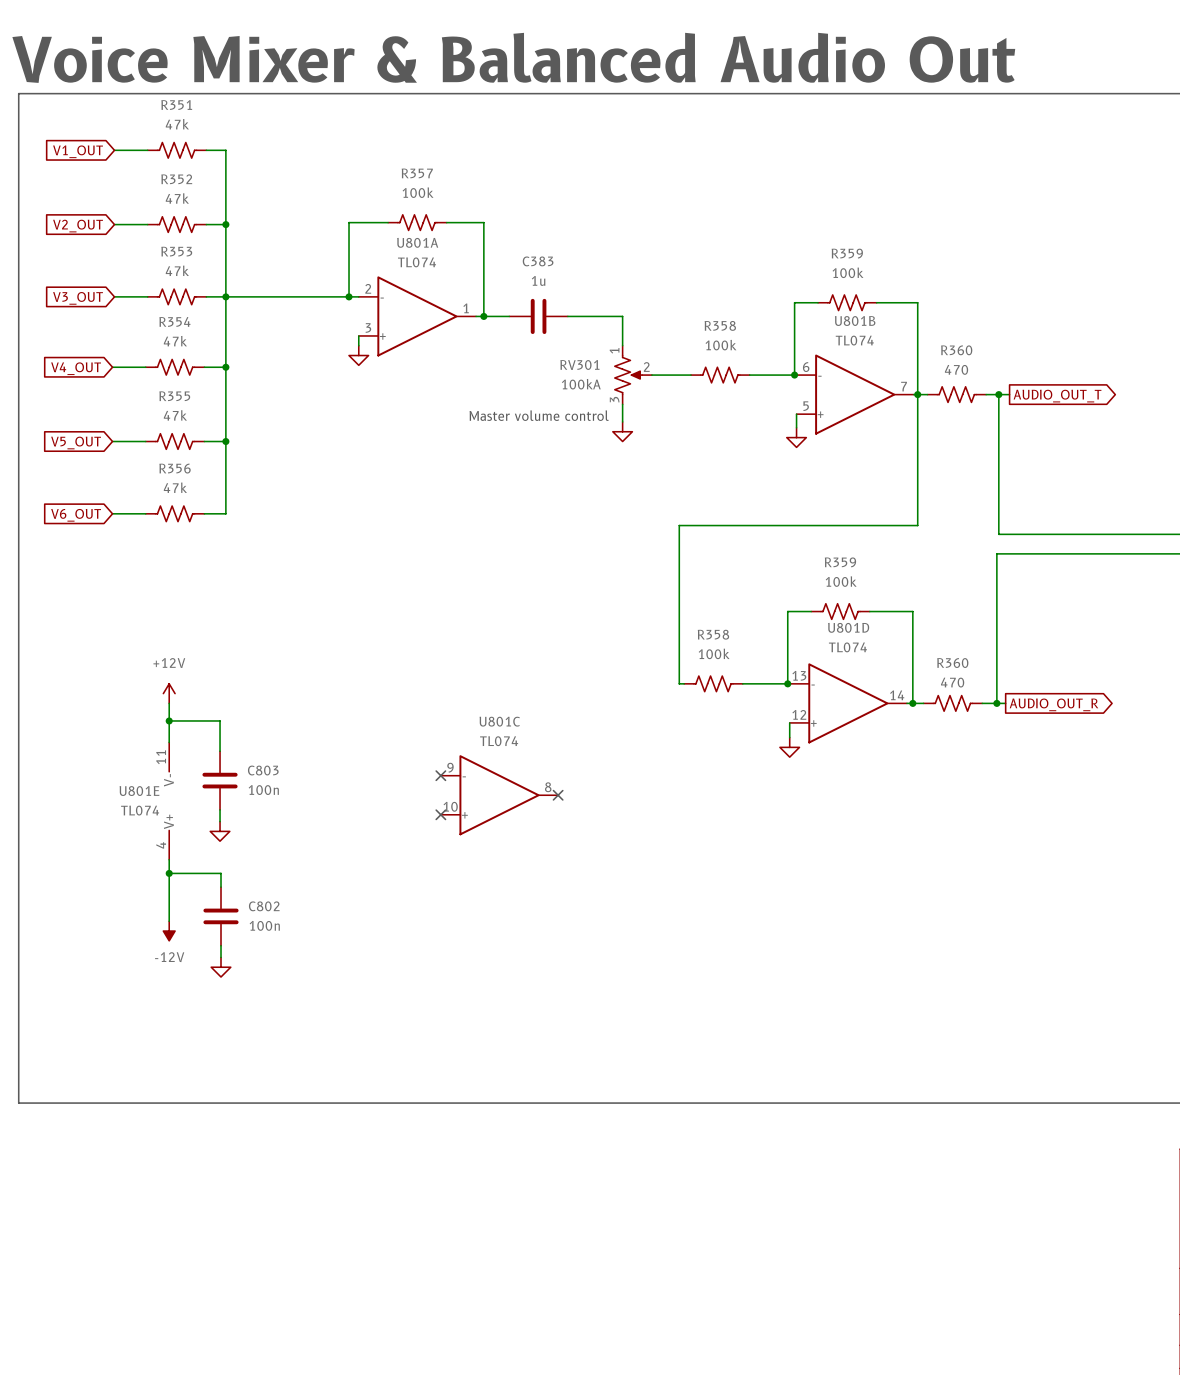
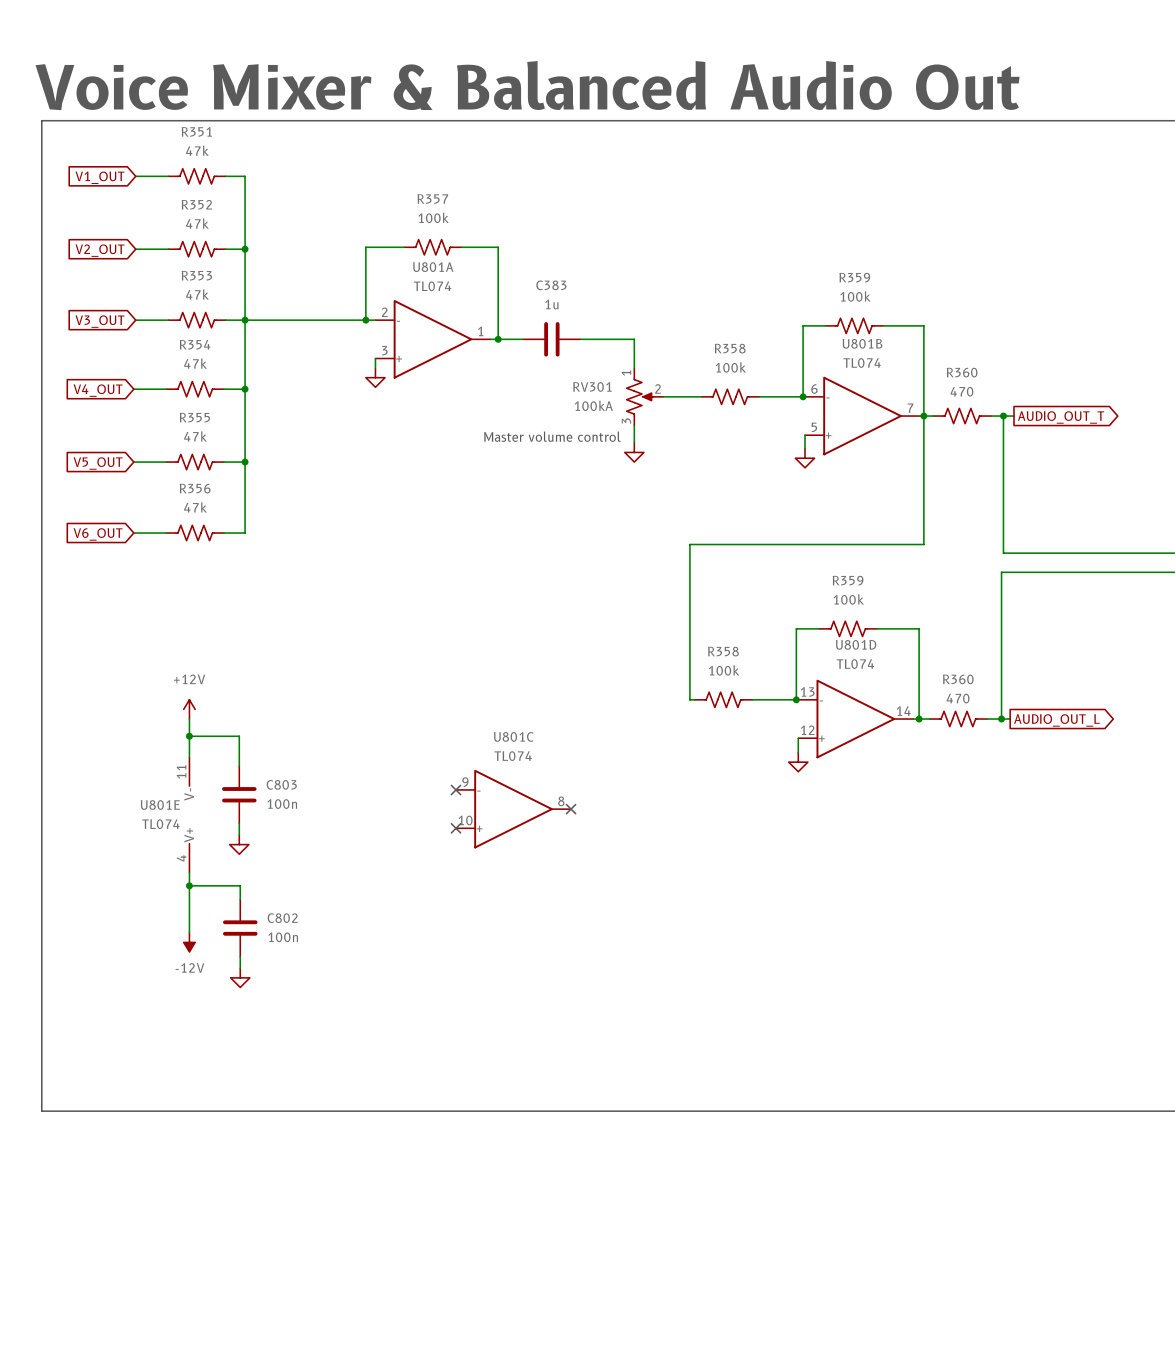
global label: AUDIO_OUT_R (1053, 704) -> AUDIO_OUT_L (1056, 720)

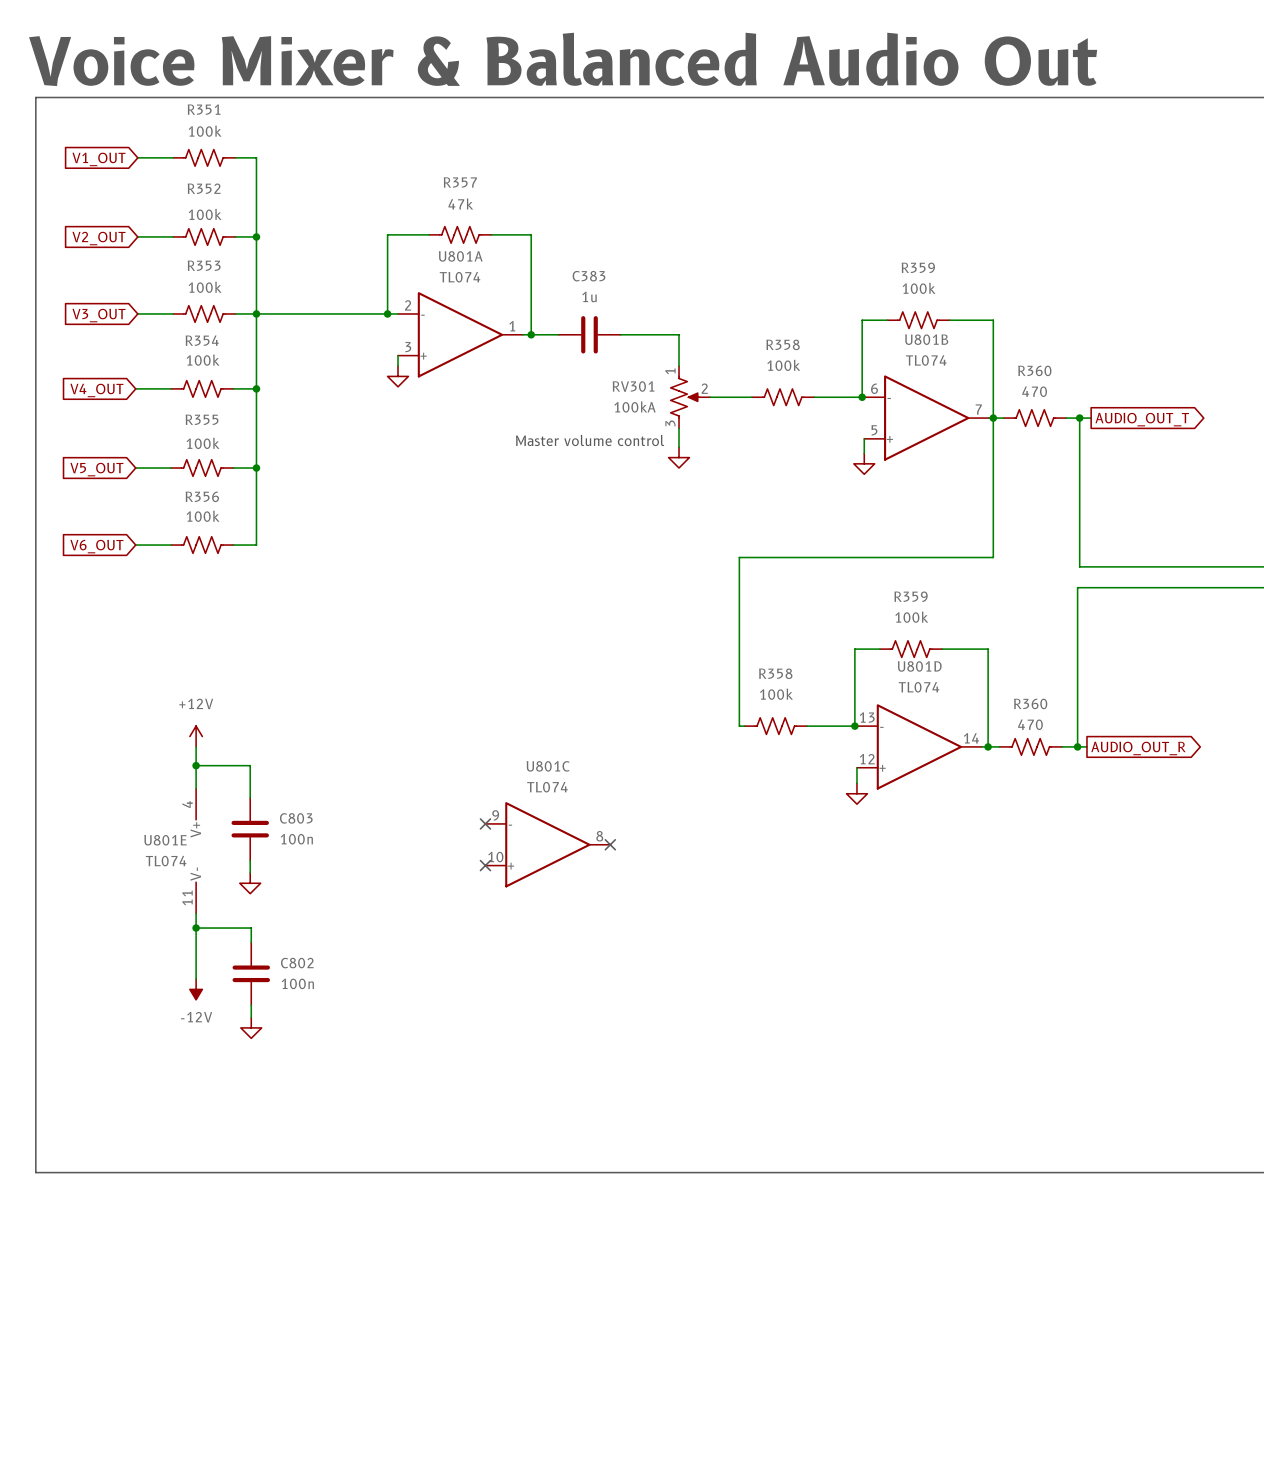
R351 value: 47k (197, 150) -> 100k (205, 131)
R357 value: 100k (433, 217) -> 47k (460, 203)
R352 value: 47k (197, 223) -> 100k (205, 214)
R353 value: 47k (197, 294) -> 100k (205, 287)
R354 value: 47k (195, 363) -> 100k (203, 360)
R355 value: 47k (195, 436) -> 100k (203, 443)
R356 value: 47k (195, 507) -> 100k (203, 516)
global label: AUDIO_OUT_L (1056, 720) -> AUDIO_OUT_R (1138, 748)
U801E rotation: 0° (189, 814) -> 180° (196, 851)

